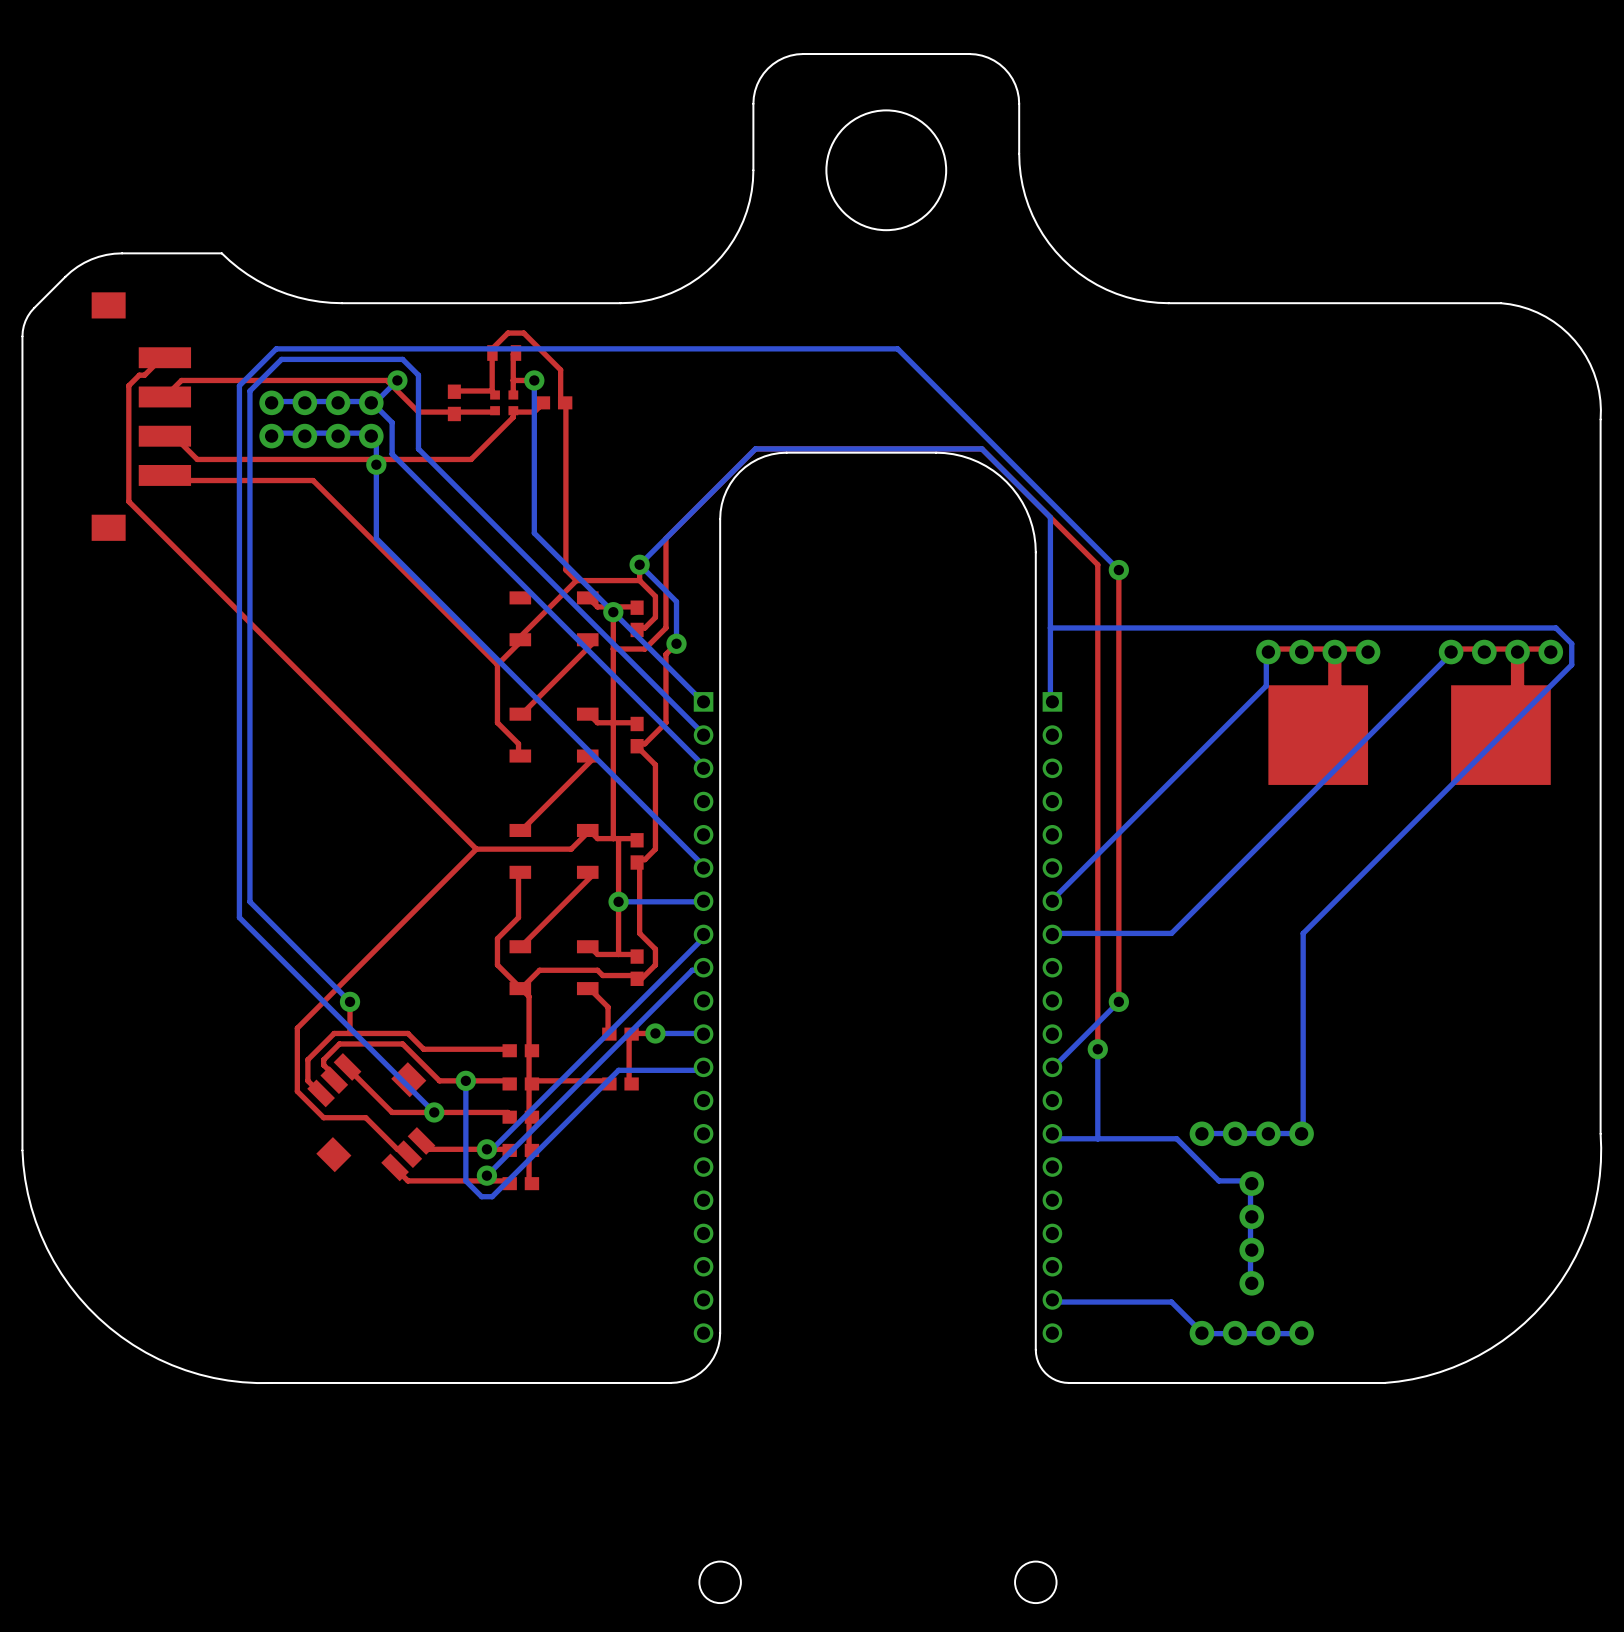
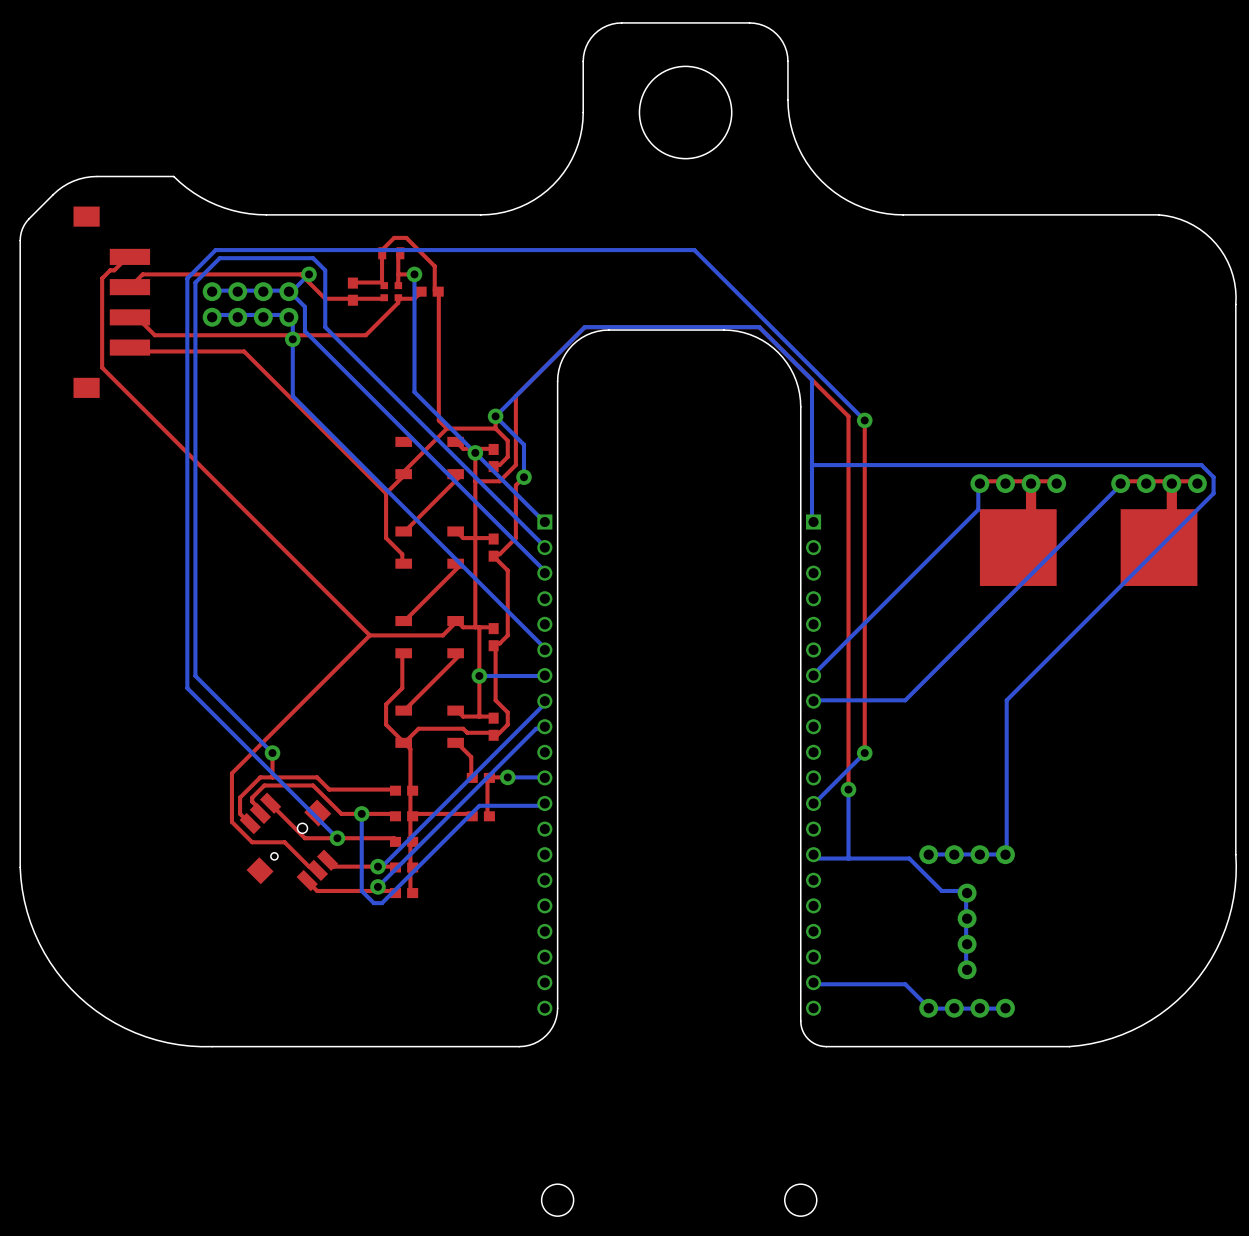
part footprint: [307, 1053, 436, 1182] -> [239, 792, 339, 892]

